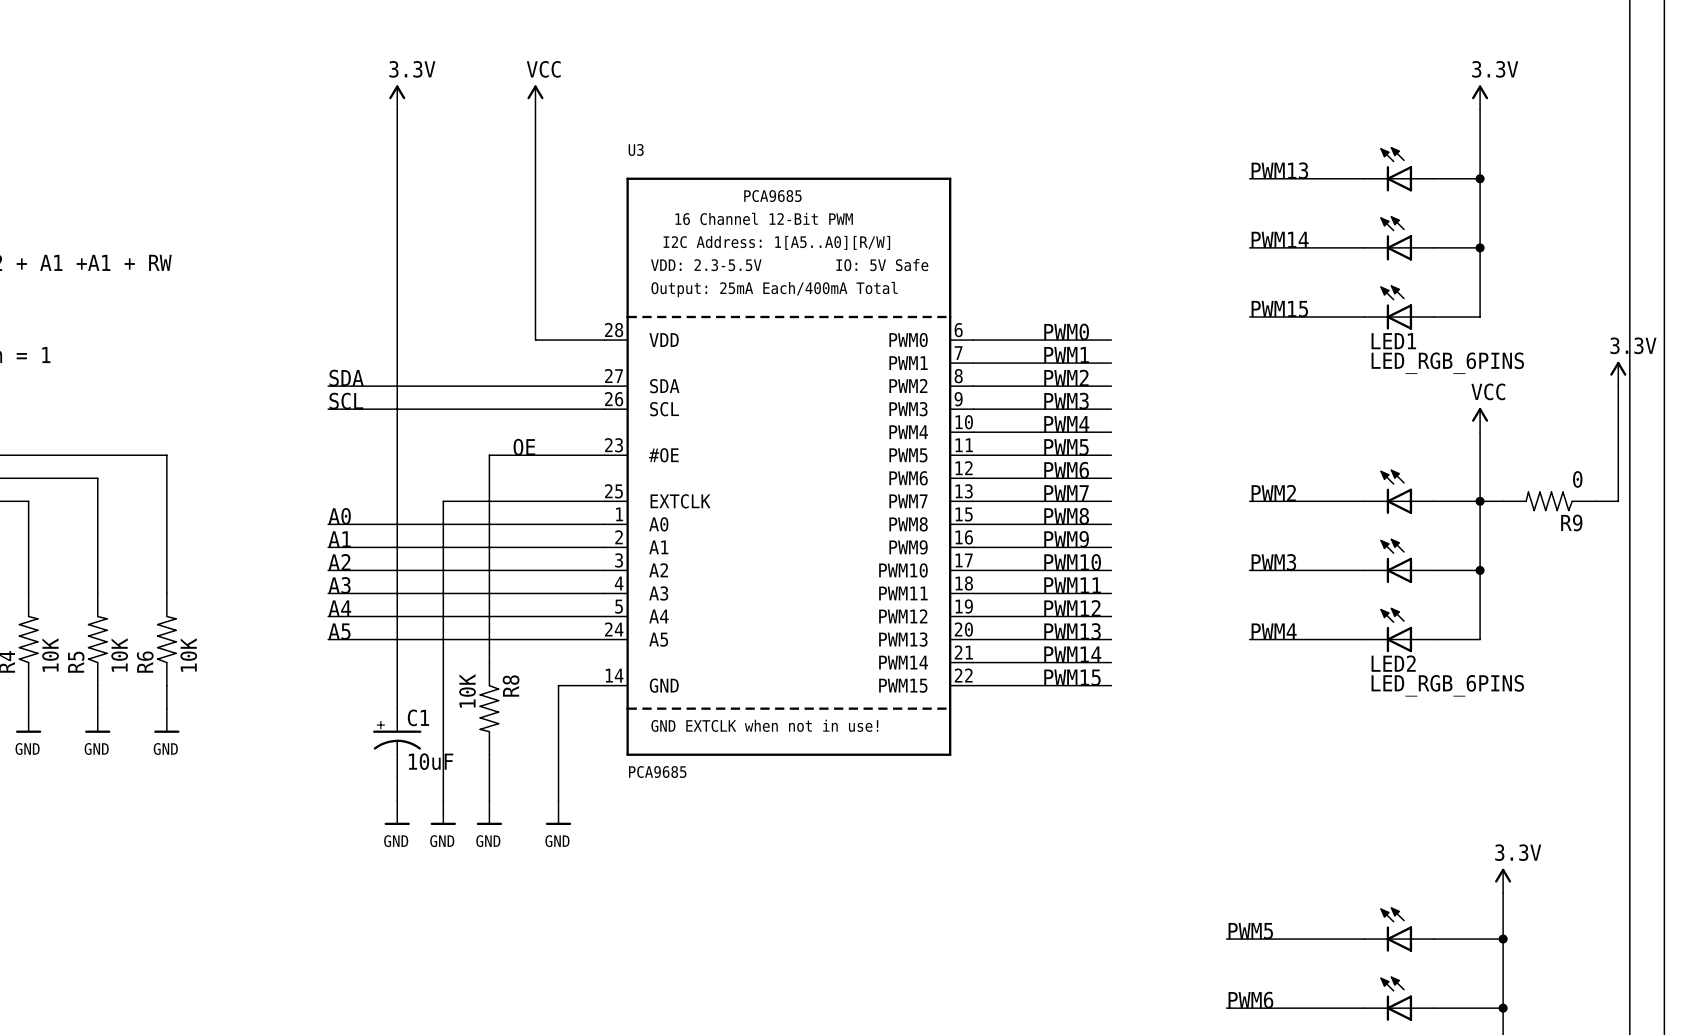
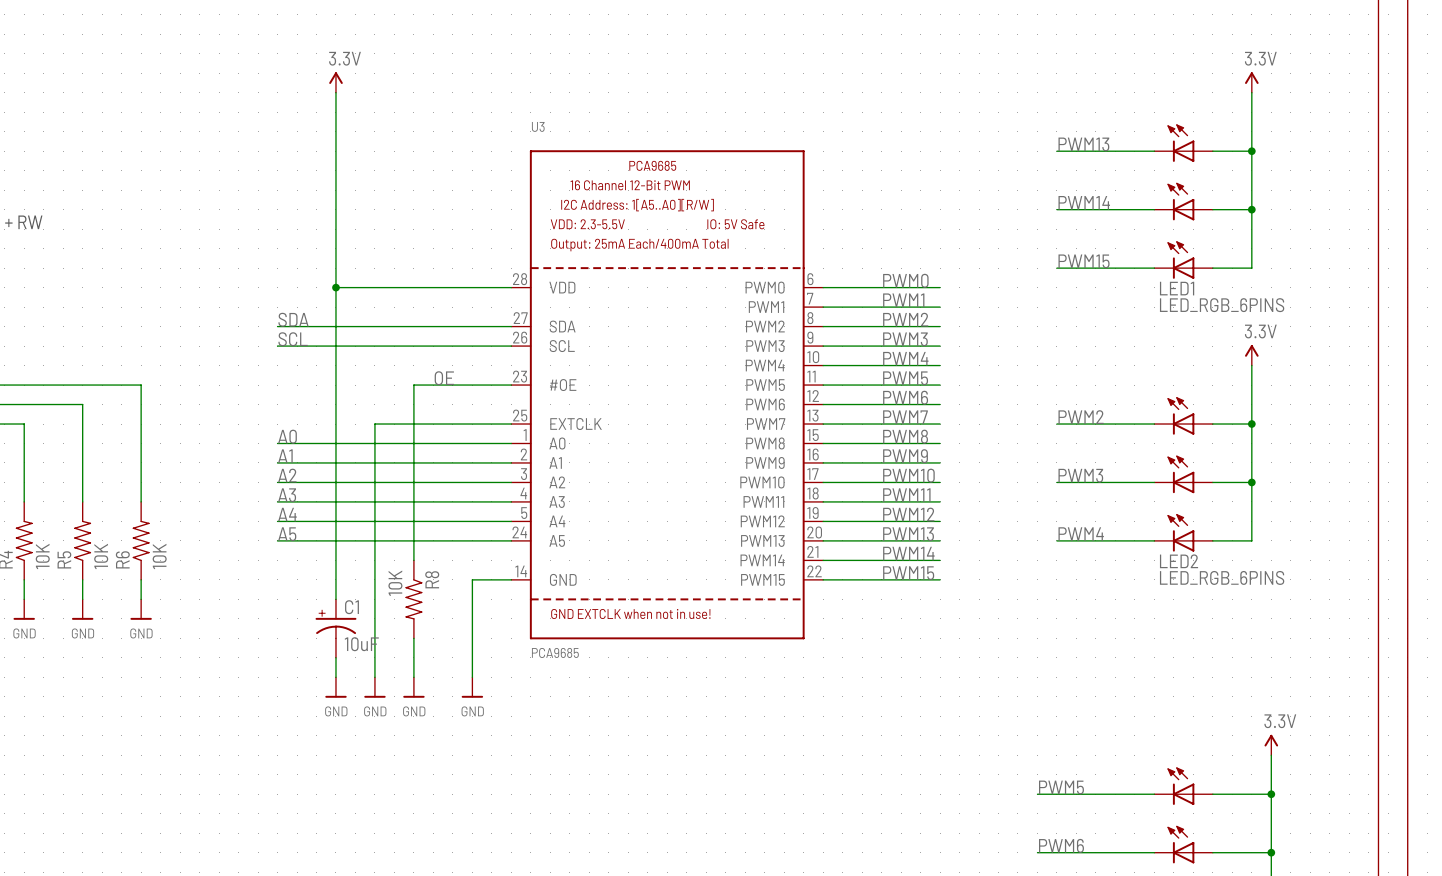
power symbol: VCC (535, 97) -> none
wire: (535, 109) (535, 340) -> (335, 287) (452, 287)
junction: none -> (335, 287)
power symbol: 3.3V (1618, 374) -> none
wire: (1618, 386) (1618, 501) (1595, 501) -> none
power symbol: VCC (1480, 420) -> 3.3V (1251, 355)
wire: (1480, 501) (1503, 501) -> none
R9: 0 (1549, 501) -> none

